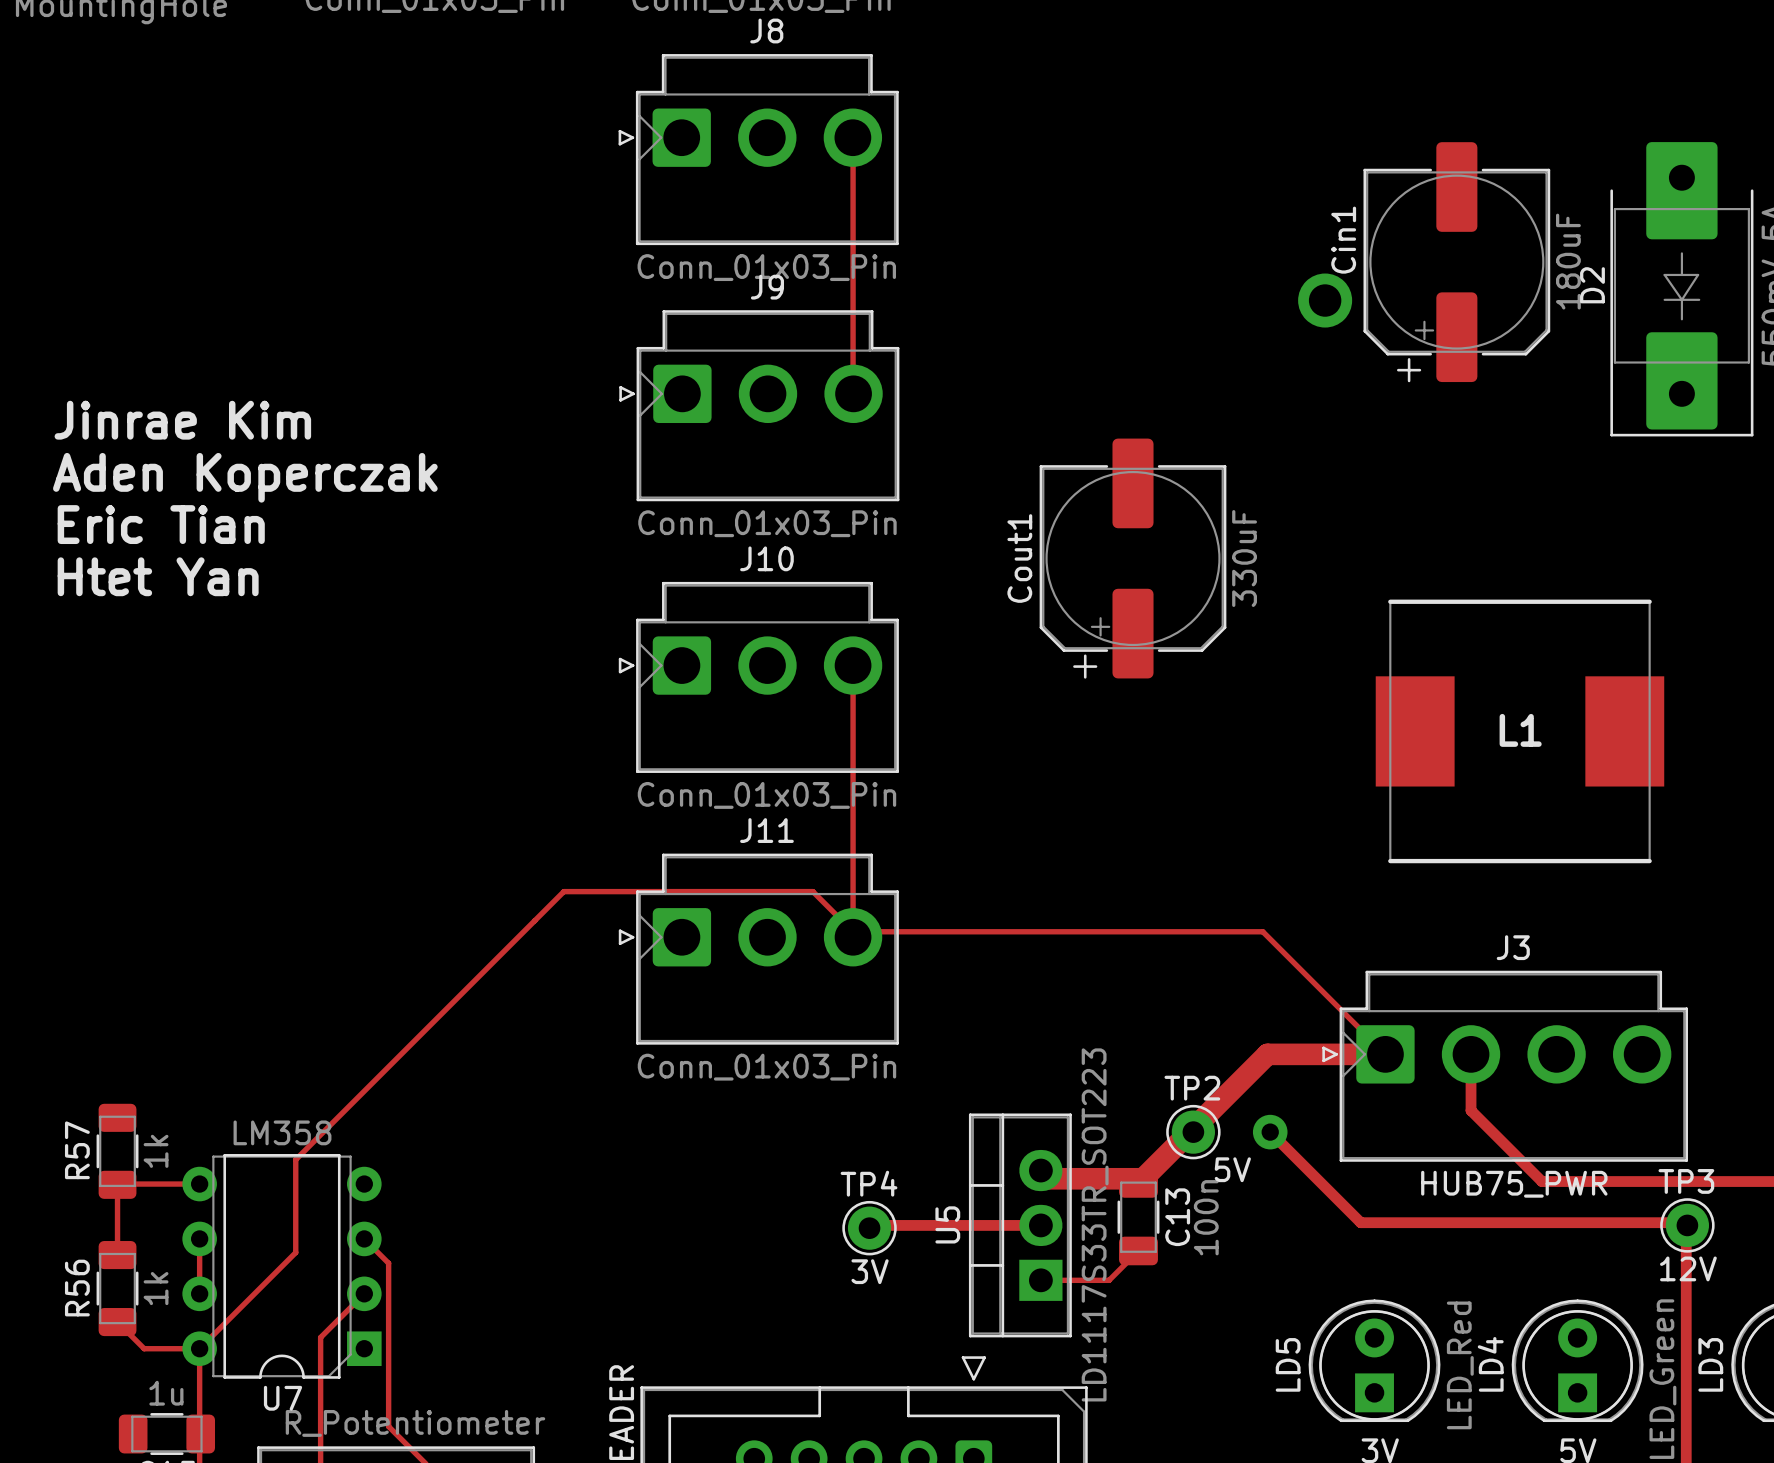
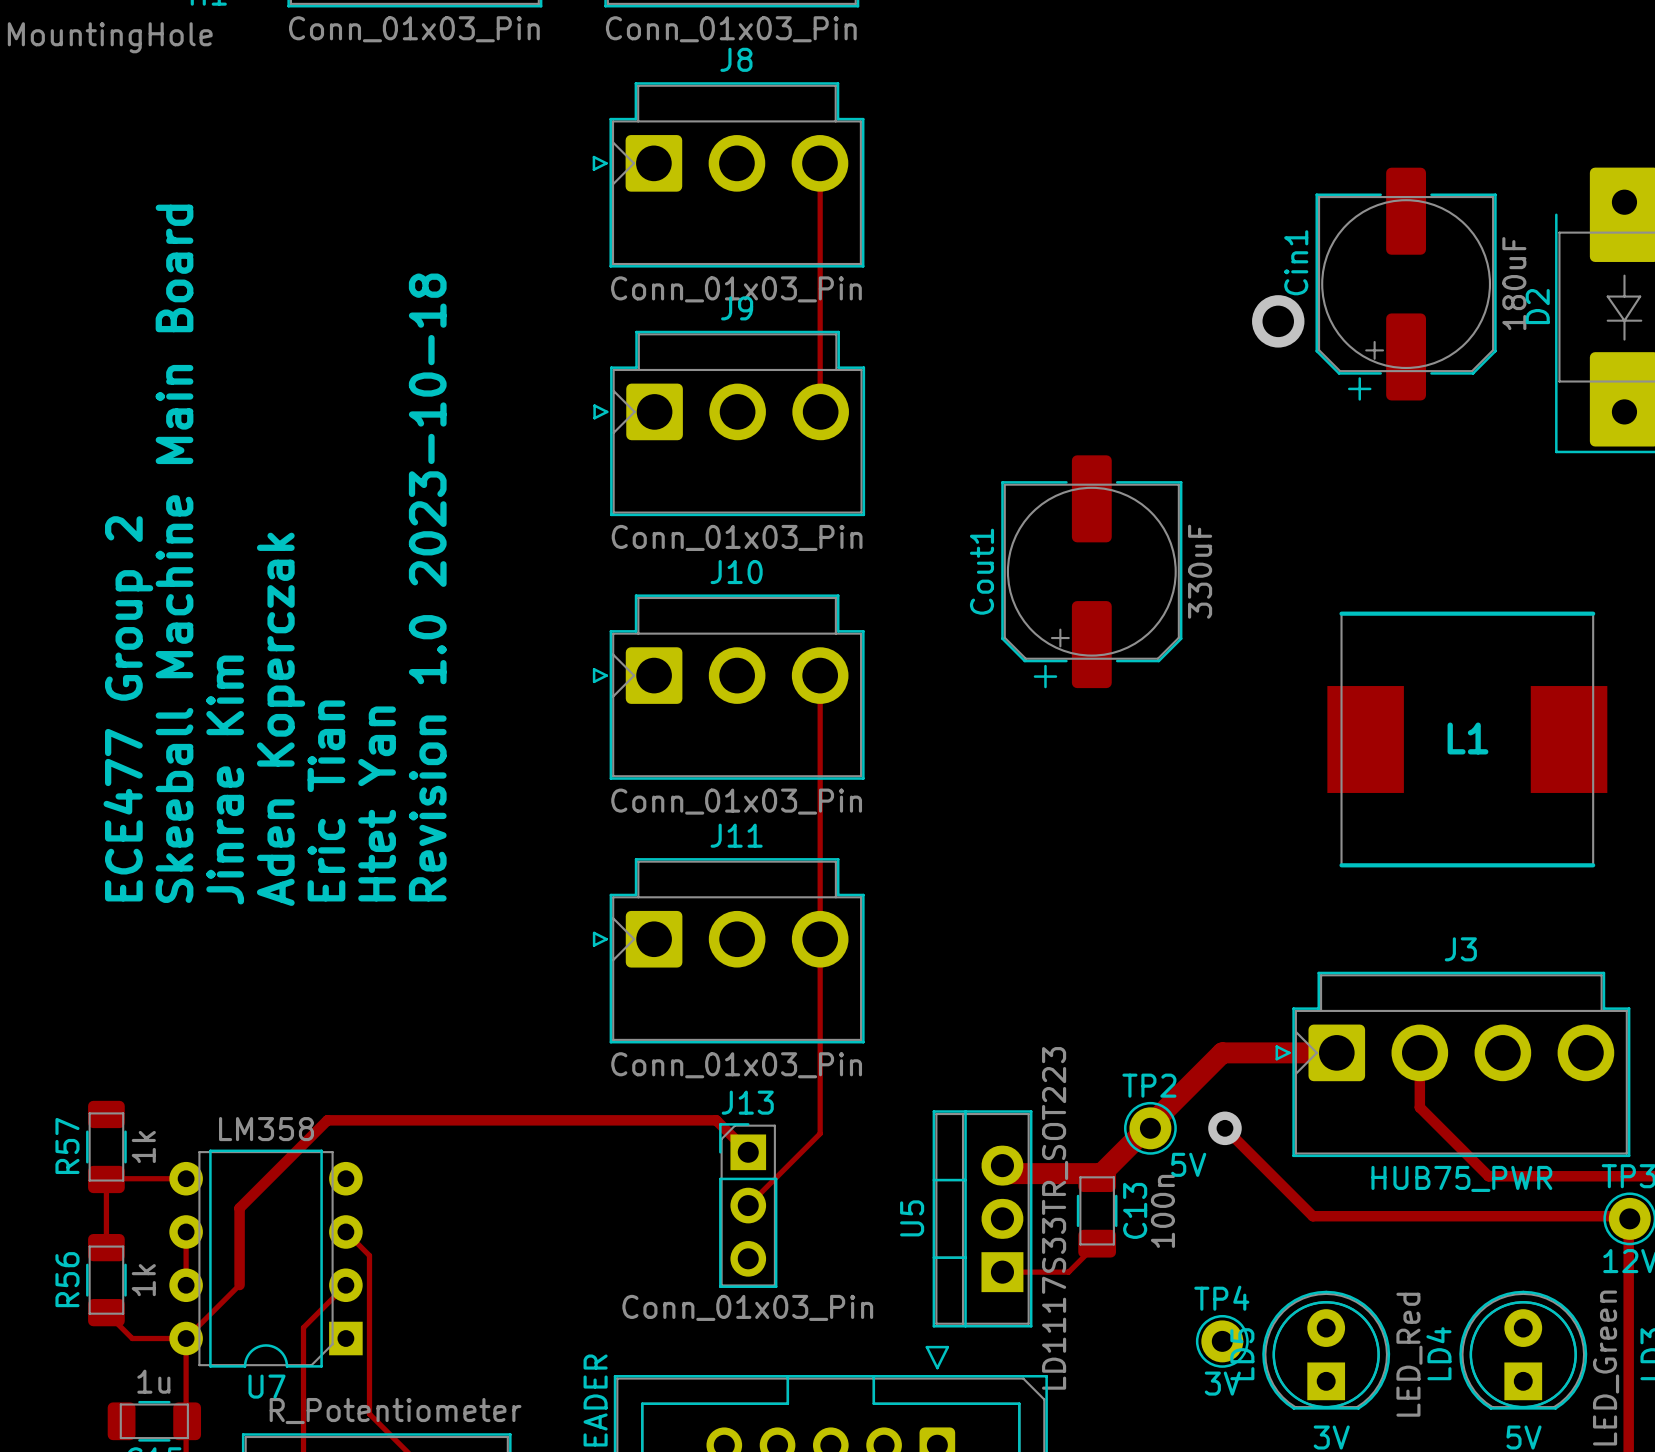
text rotation: 0° (182, 420) -> 90° counterclockwise (225, 779)
text rotation: 0° (245, 477) -> 90° counterclockwise (281, 719)
text rotation: 0° (161, 524) -> 90° counterclockwise (326, 800)
text: none -> Skeeball Machine Main Board (174, 553)
text: none -> Revision 1.0 2023-10-18 (427, 587)
text rotation: 0° (158, 576) -> 90° counterclockwise (377, 803)
text: none -> ECE477 Group 2 (128, 708)
track: none -> (820, 939) (820, 1133) (748, 1205)
track: (1385, 1054) (1262, 931) (853, 931) (812, 891) (563, 891) (295, 1159) (295, 1252) (254, 1293) -> (748, 1152) (716, 1120) (327, 1120) (239, 1208) (239, 1285)
J13: none -> Conn_01x03_Pin (748, 1205)
track: (880, 1222) (883, 1225) (1040, 1225) -> none
TP4 position: (869, 1228) -> (1222, 1341)

